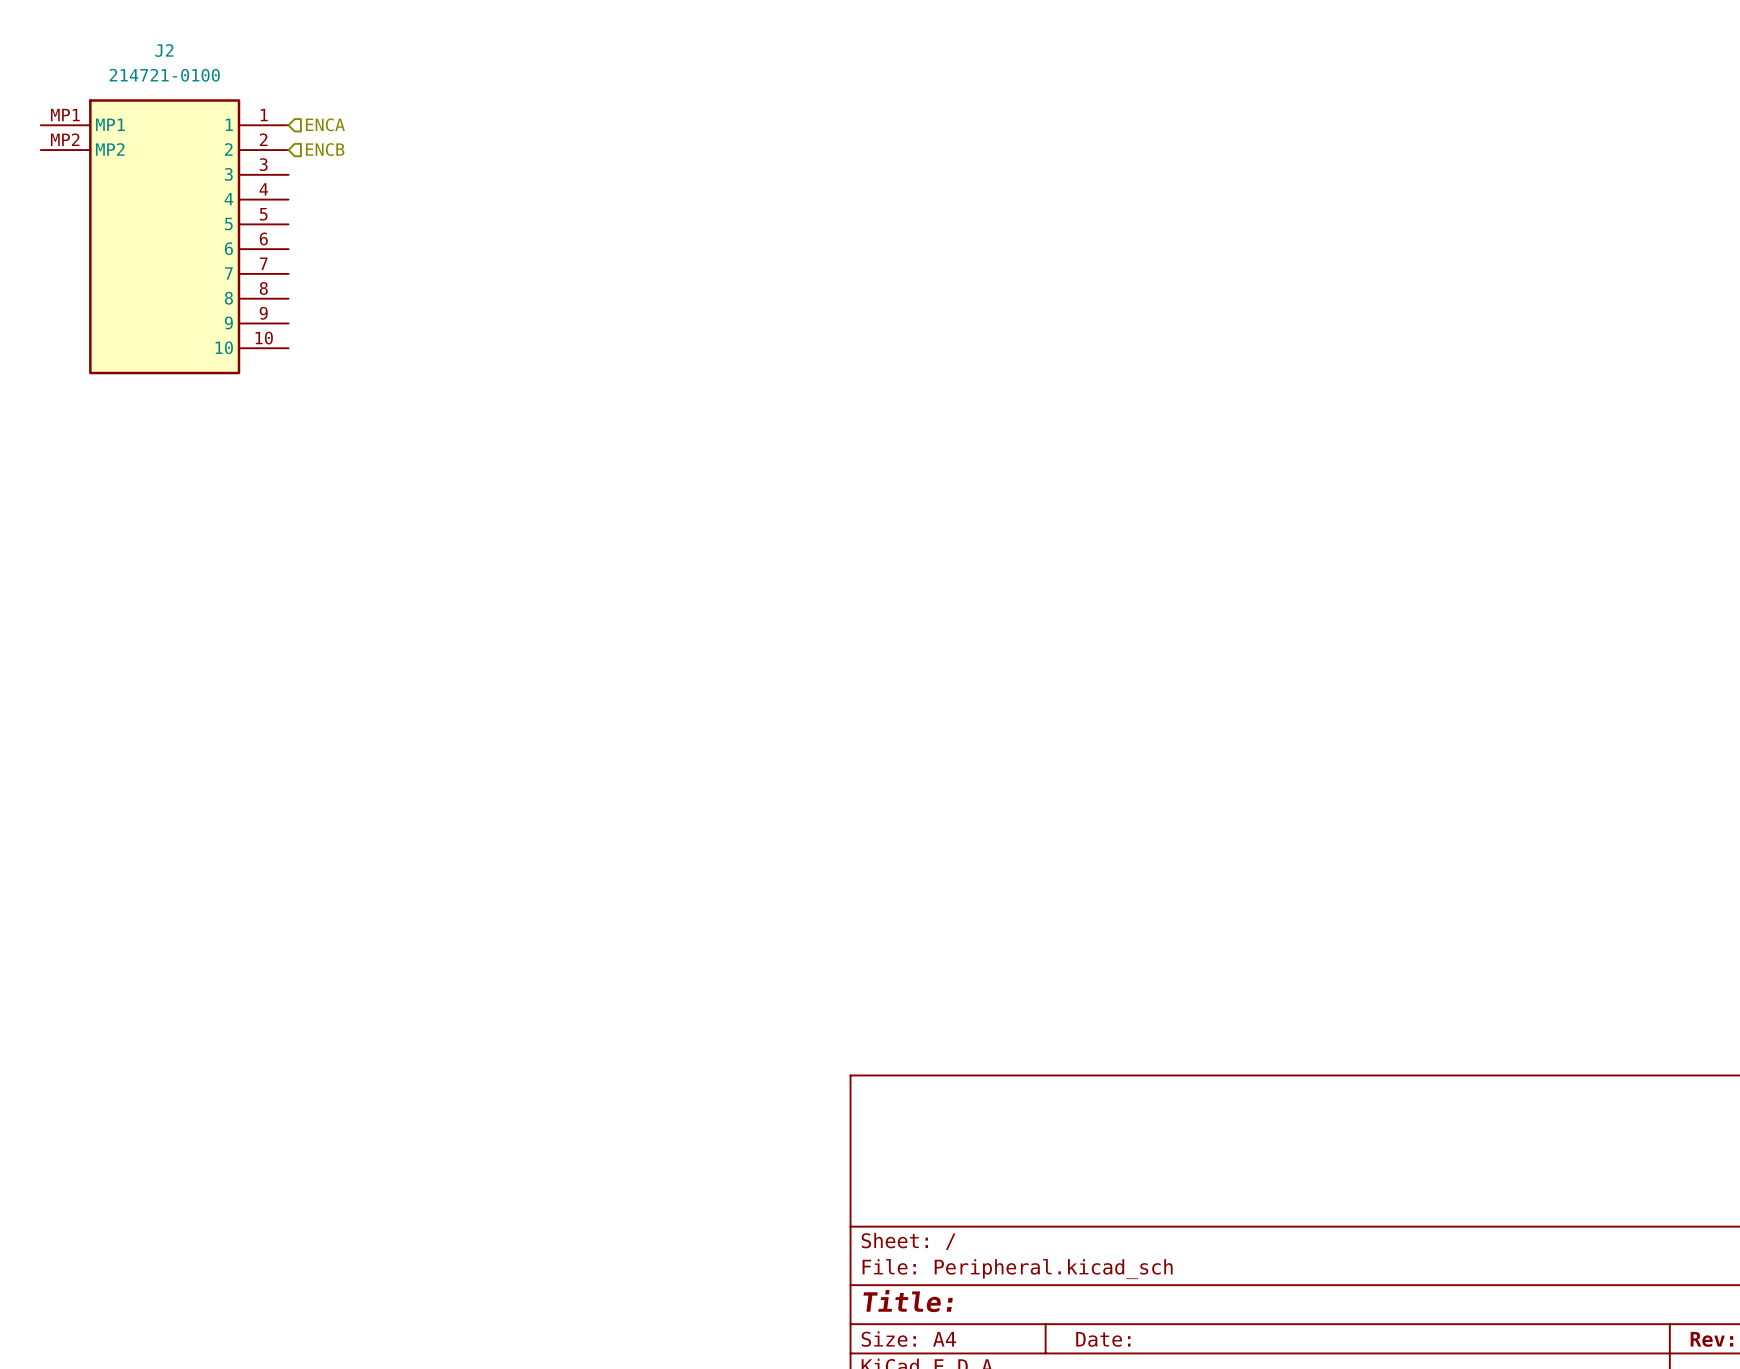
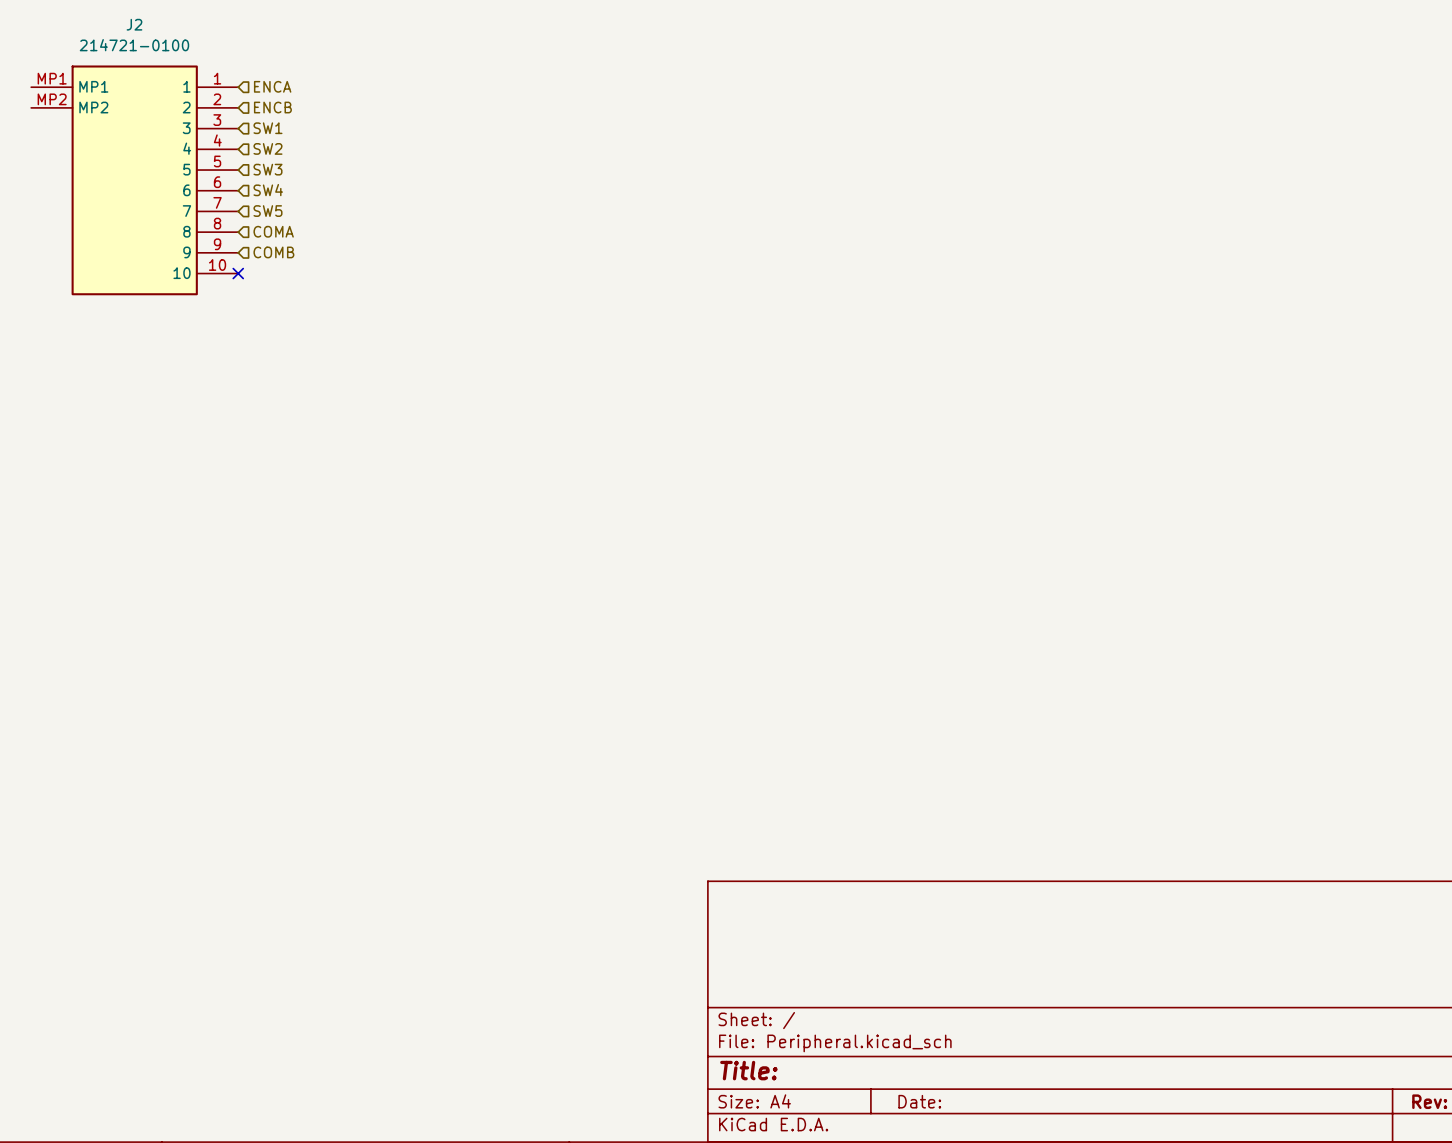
hierarchical label: none -> SW1 (267, 128)
hierarchical label: none -> SW2 (267, 148)
hierarchical label: none -> SW3 (267, 169)
hierarchical label: none -> SW4 (268, 190)
hierarchical label: none -> SW5 (267, 211)
hierarchical label: none -> COMA (273, 231)
hierarchical label: none -> COMB (273, 252)
no-connect mark: none -> (238, 273)

